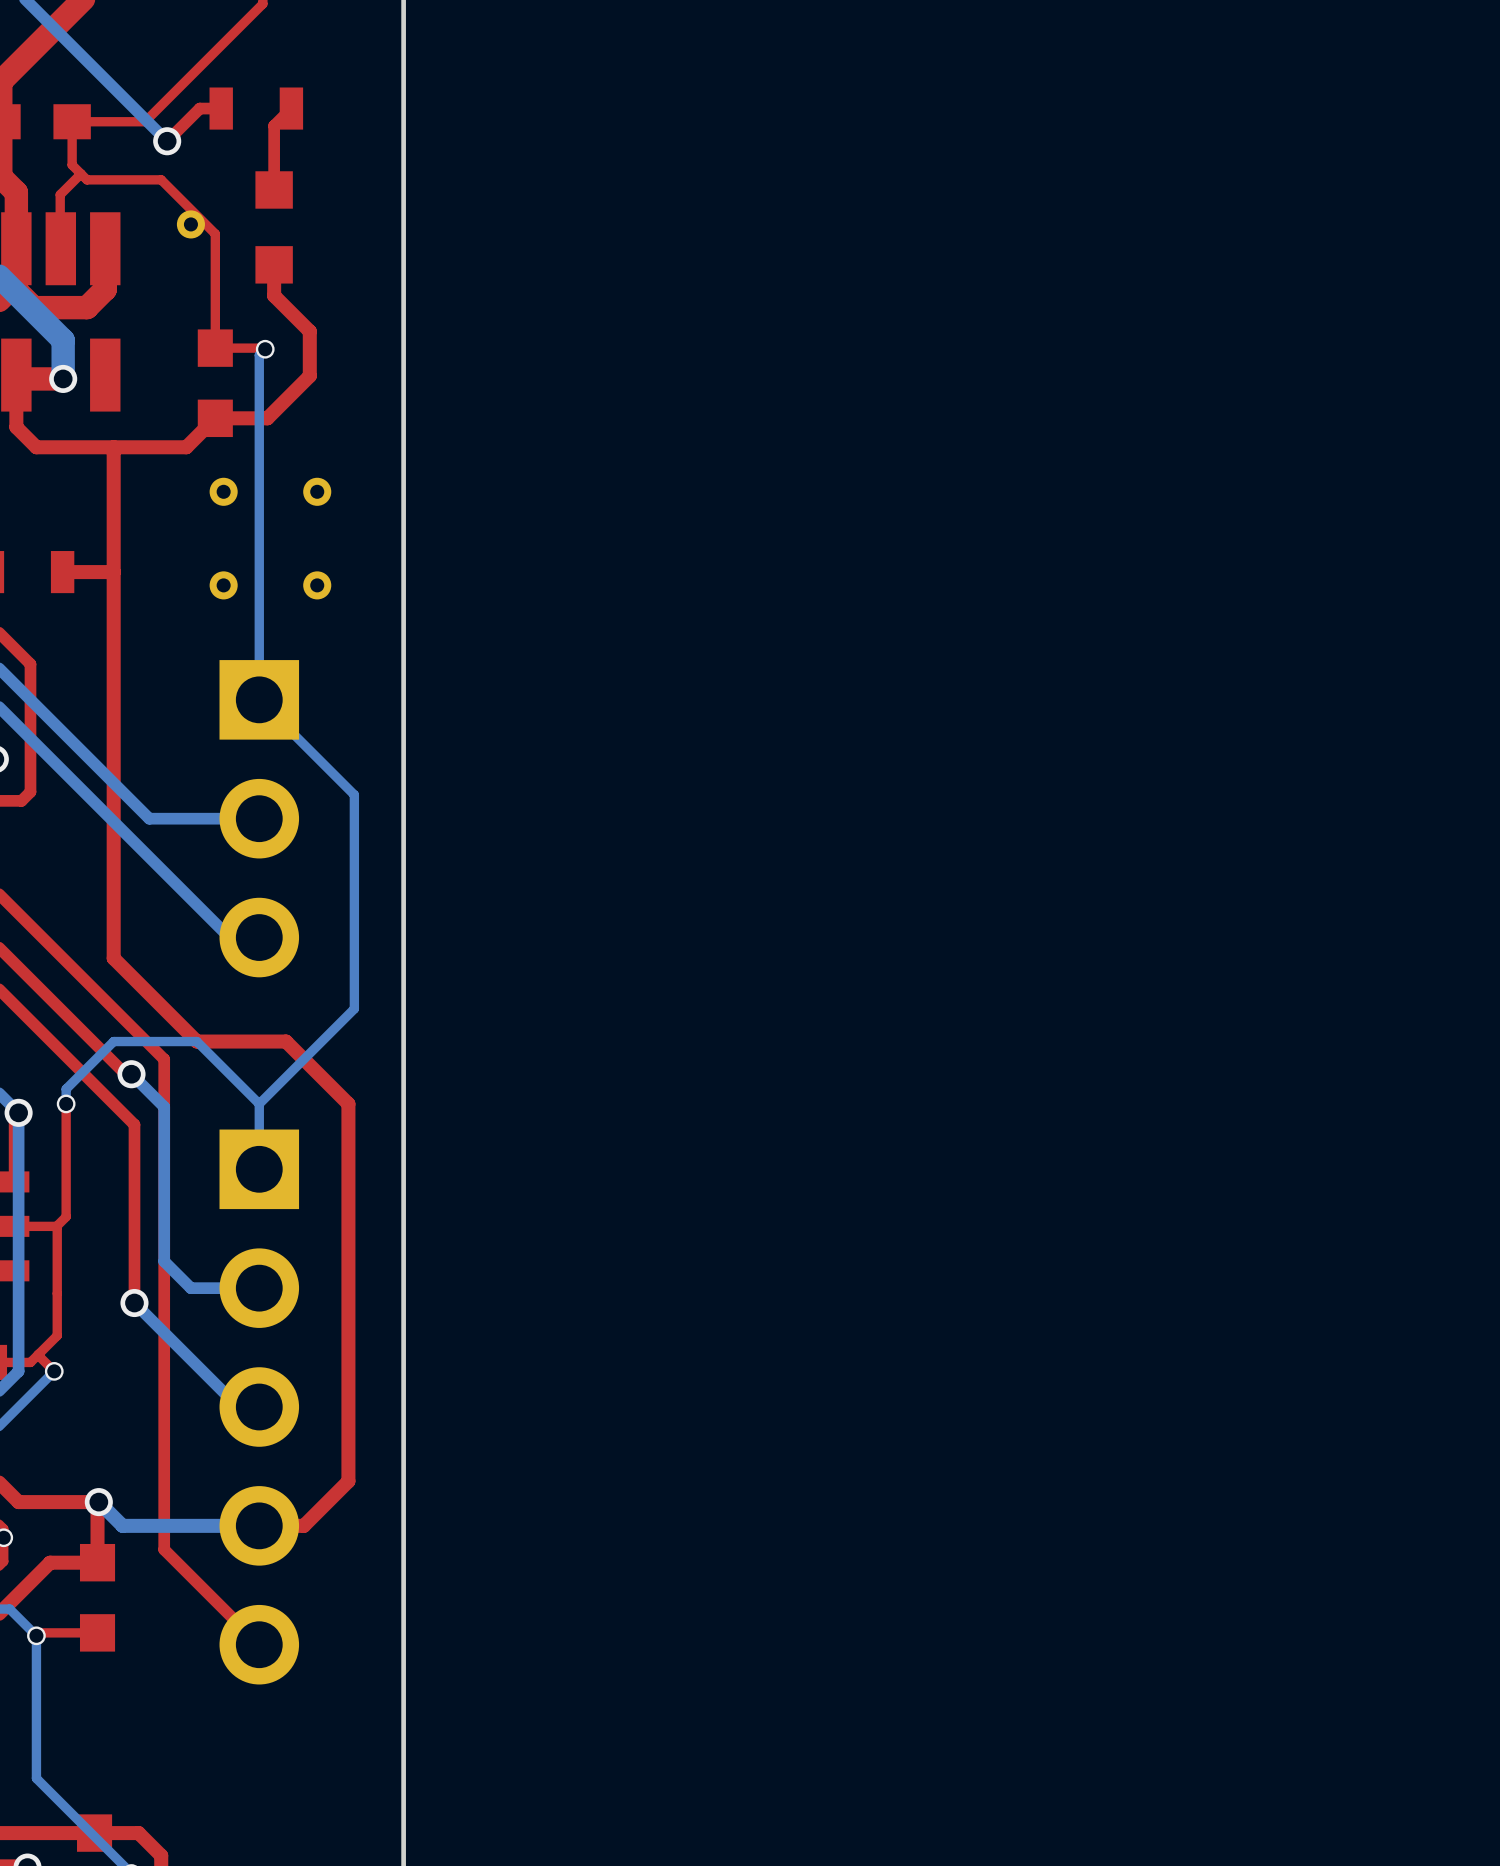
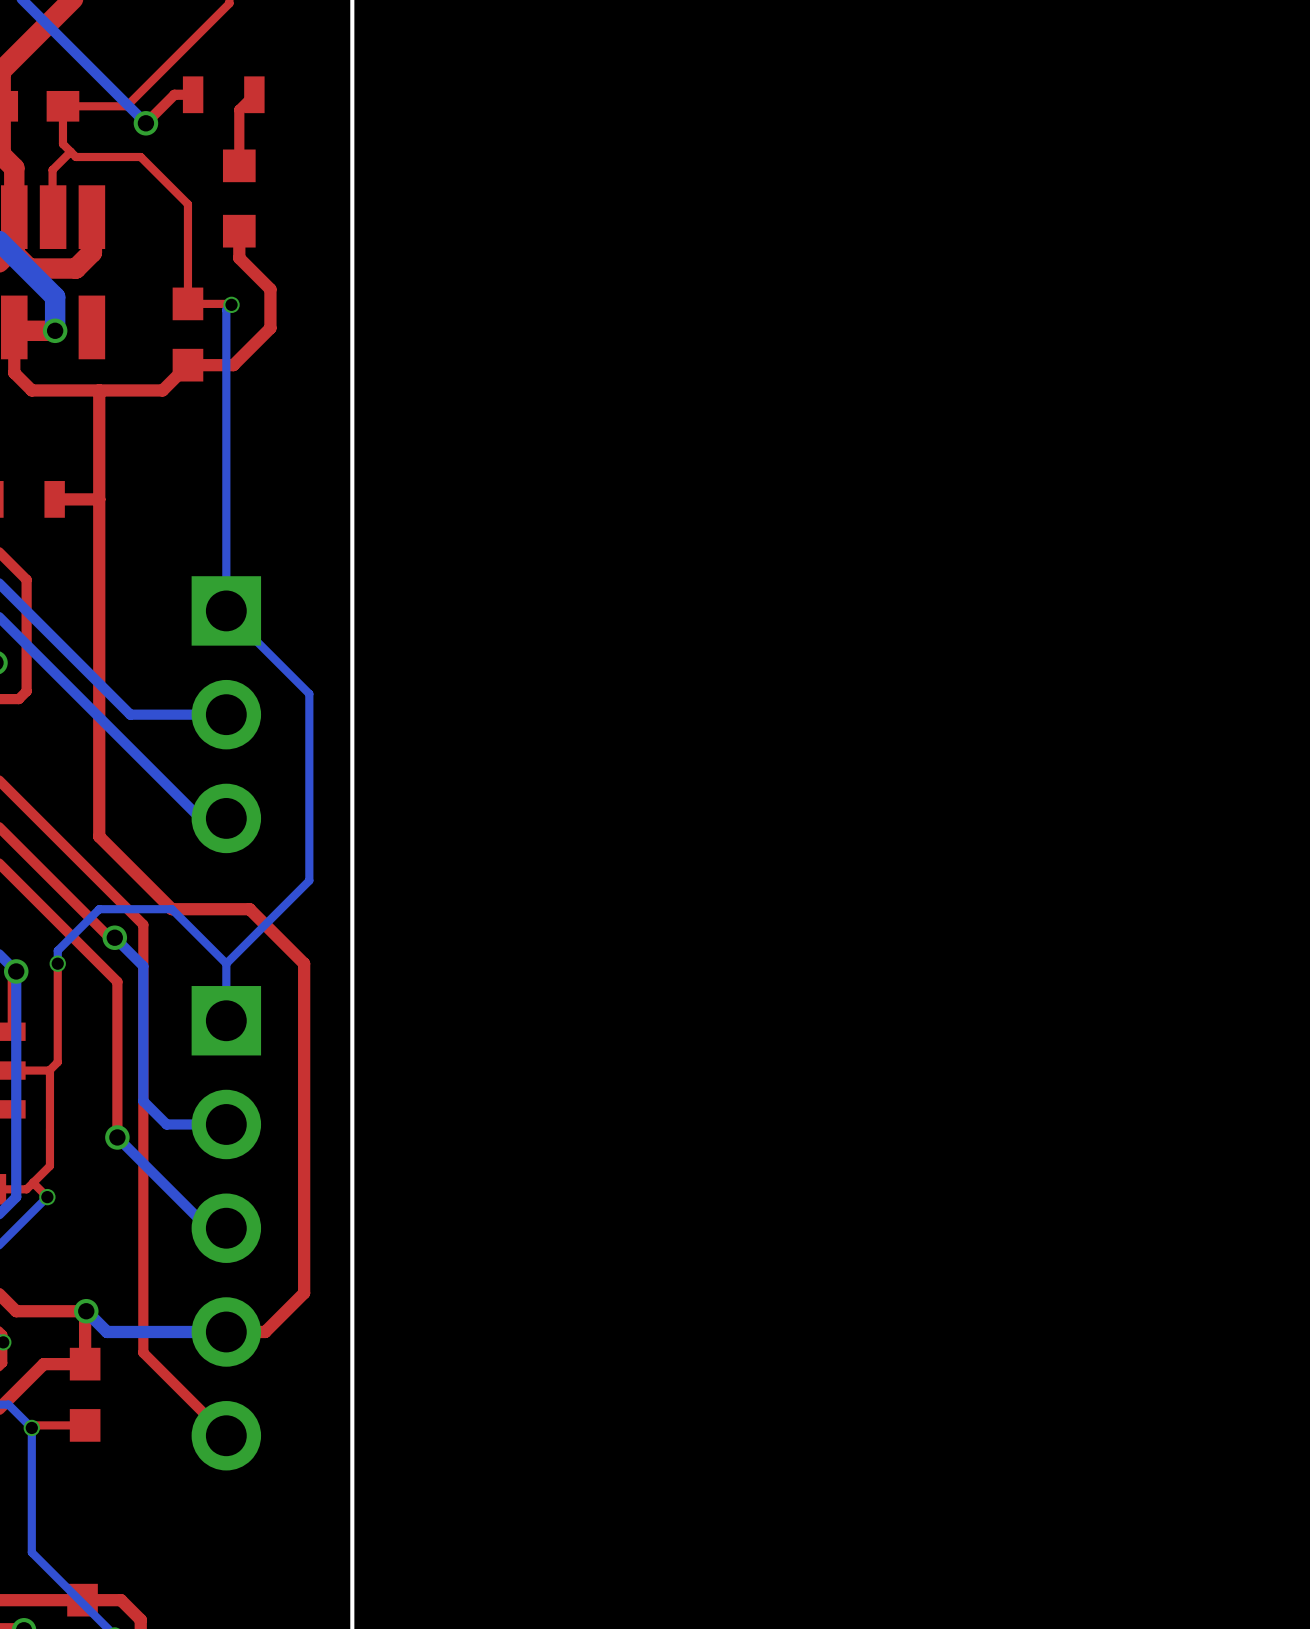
part: (190, 224) -> none
part: (223, 491) -> none
part: (317, 491) -> none
part: (223, 585) -> none
part: (317, 585) -> none

